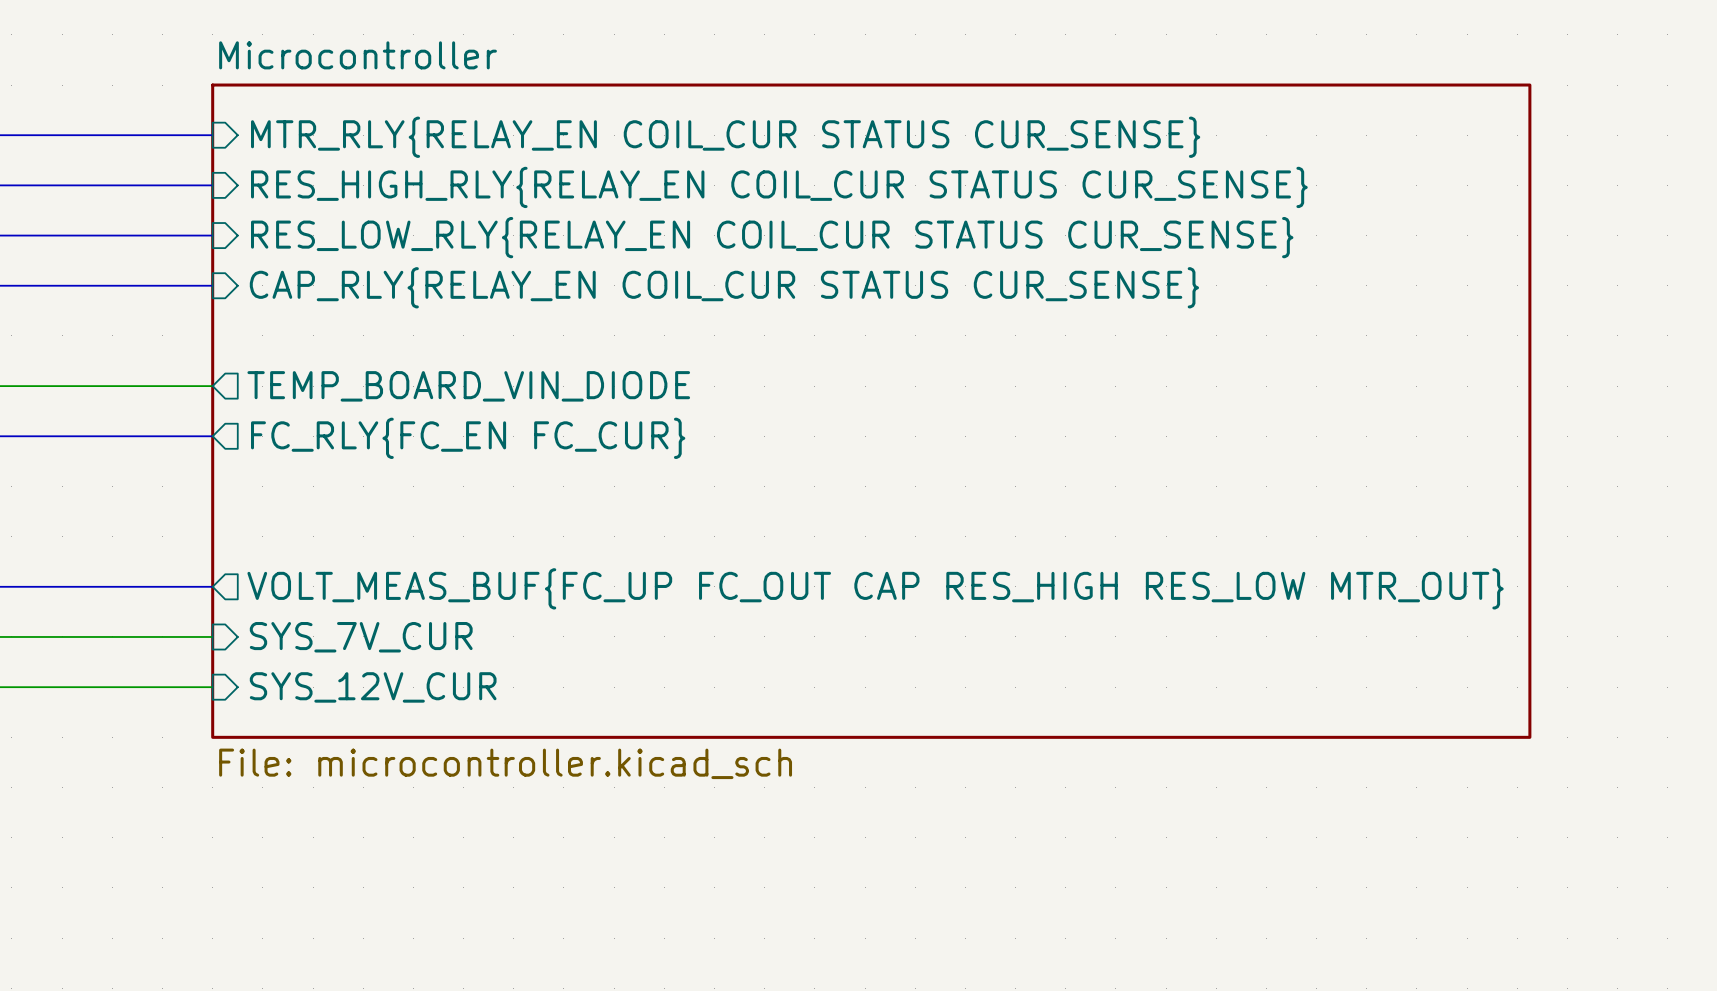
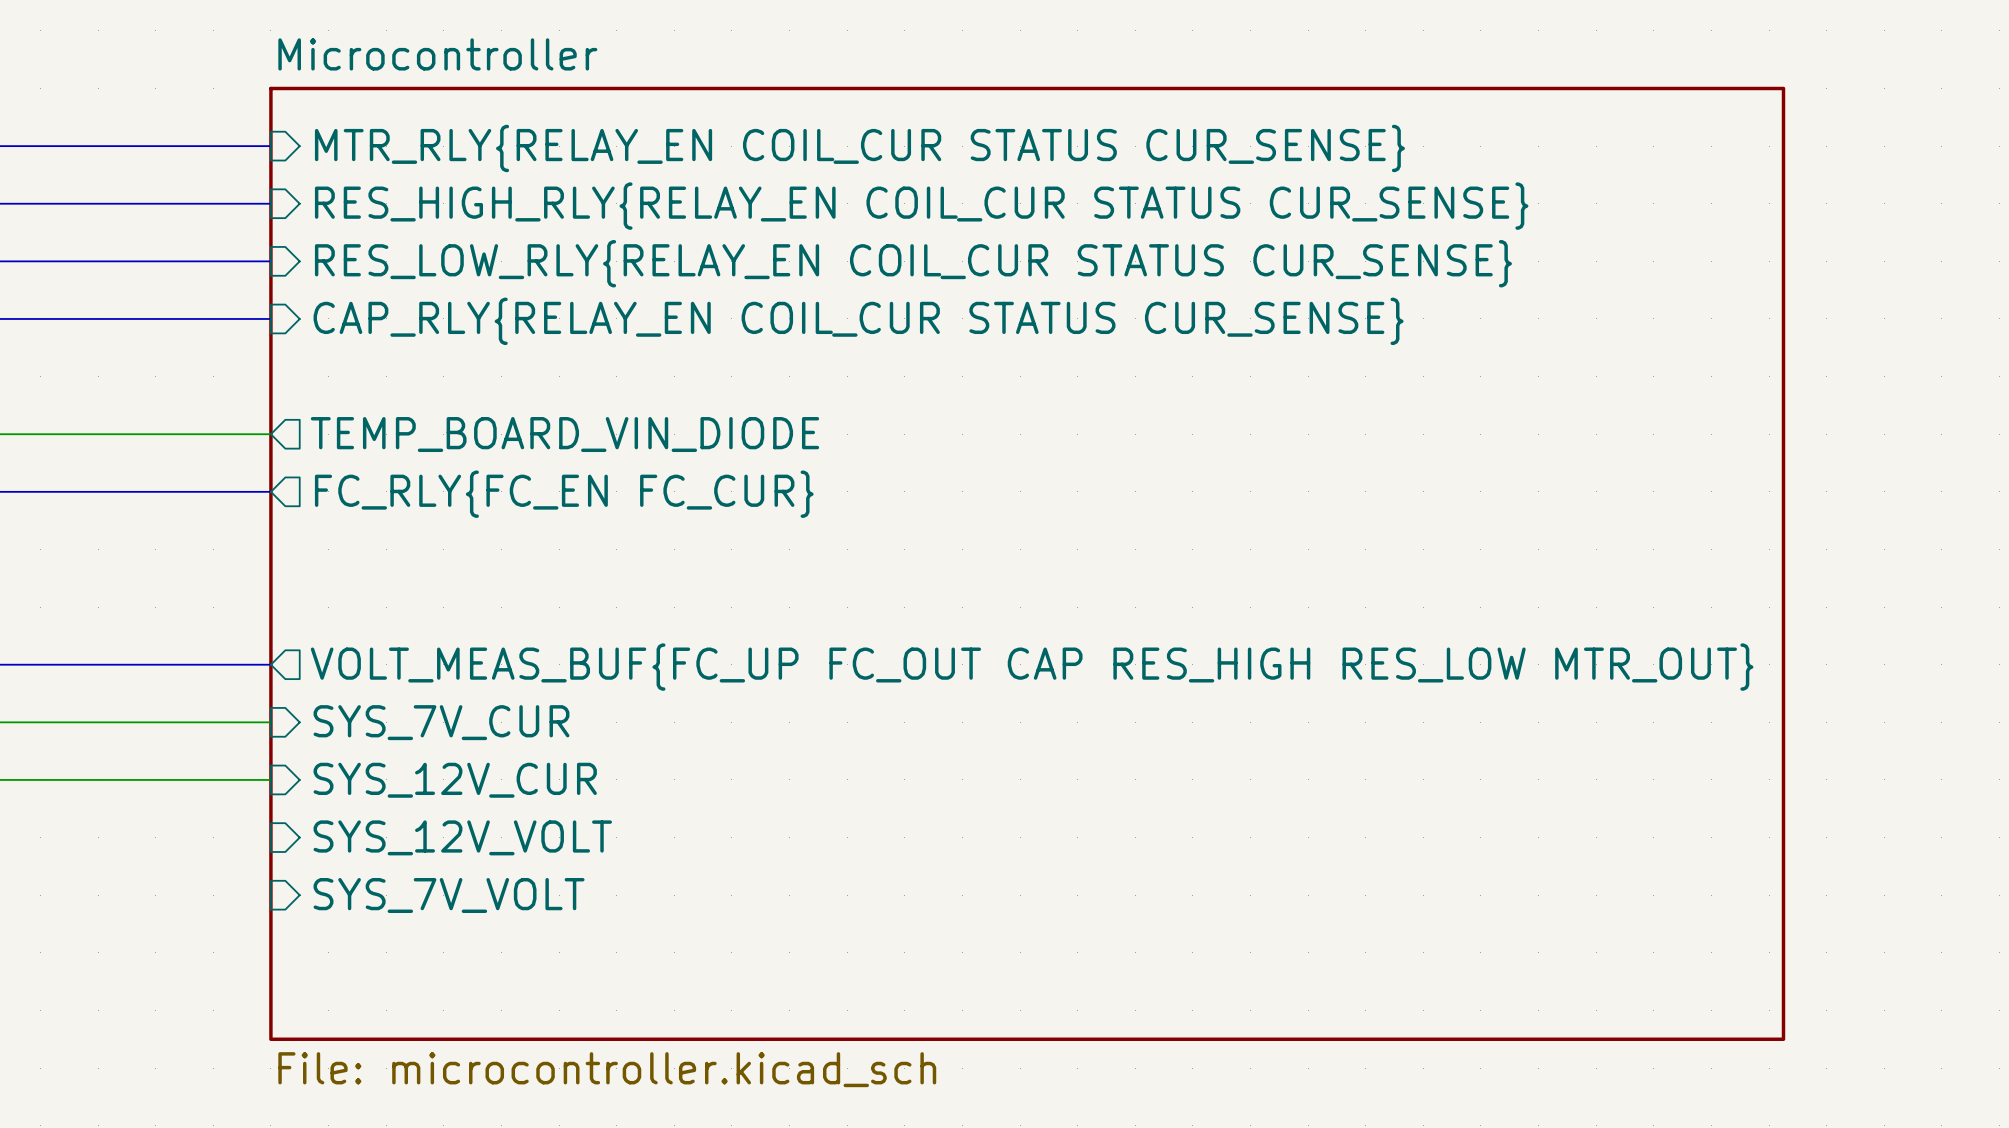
sheet Microcontroller: File: microcontroller.kicad_sch (871, 411) -> none
sheet Microcontroller: none -> File: microcontroller.kicad_sch (1027, 563)
sheet pin: none -> SYS_12V_VOLT (462, 837)
sheet pin: none -> SYS_7V_VOLT (449, 895)

